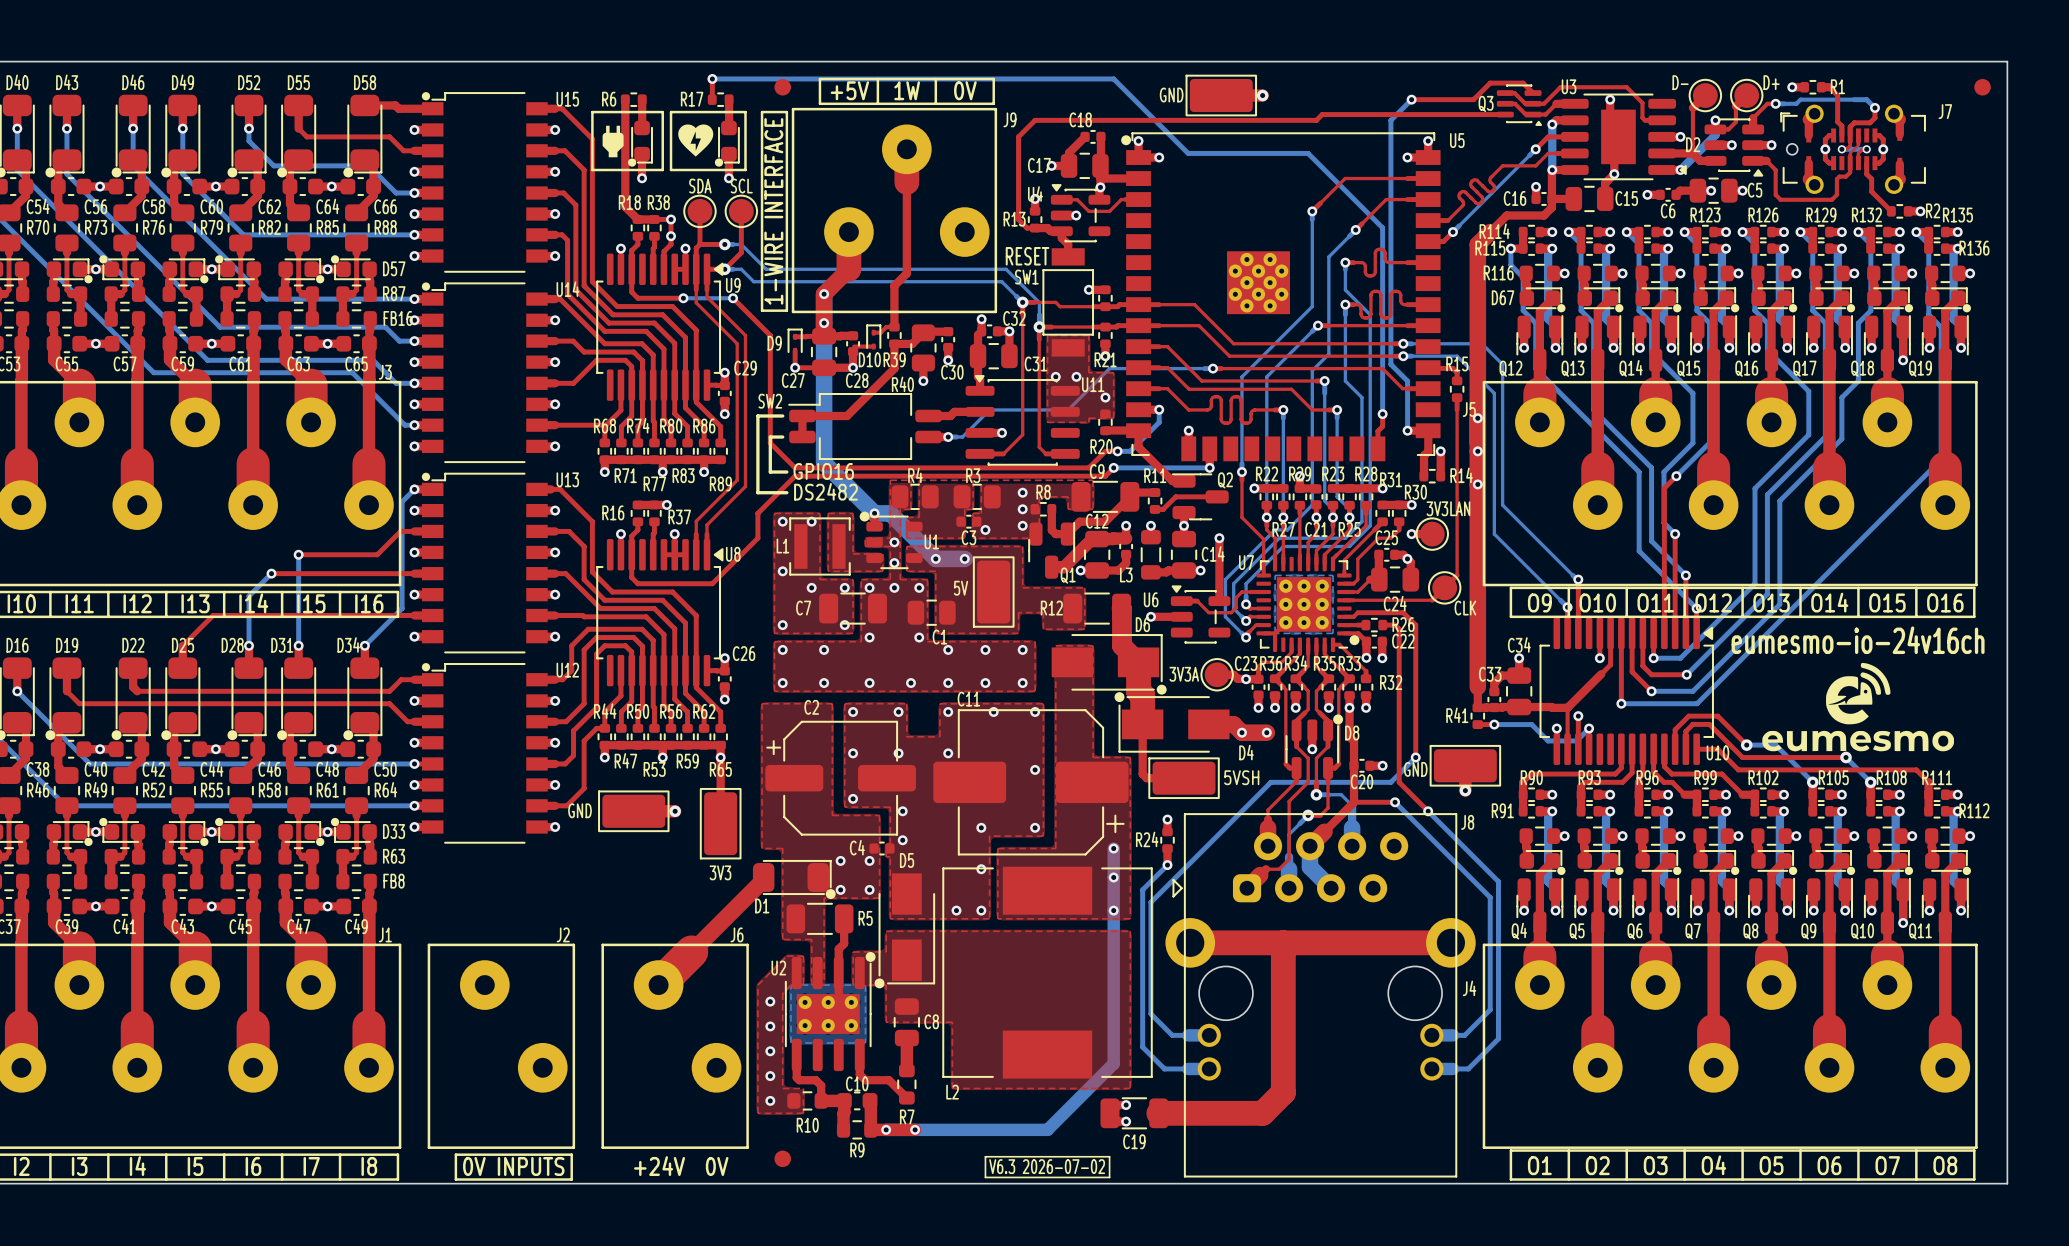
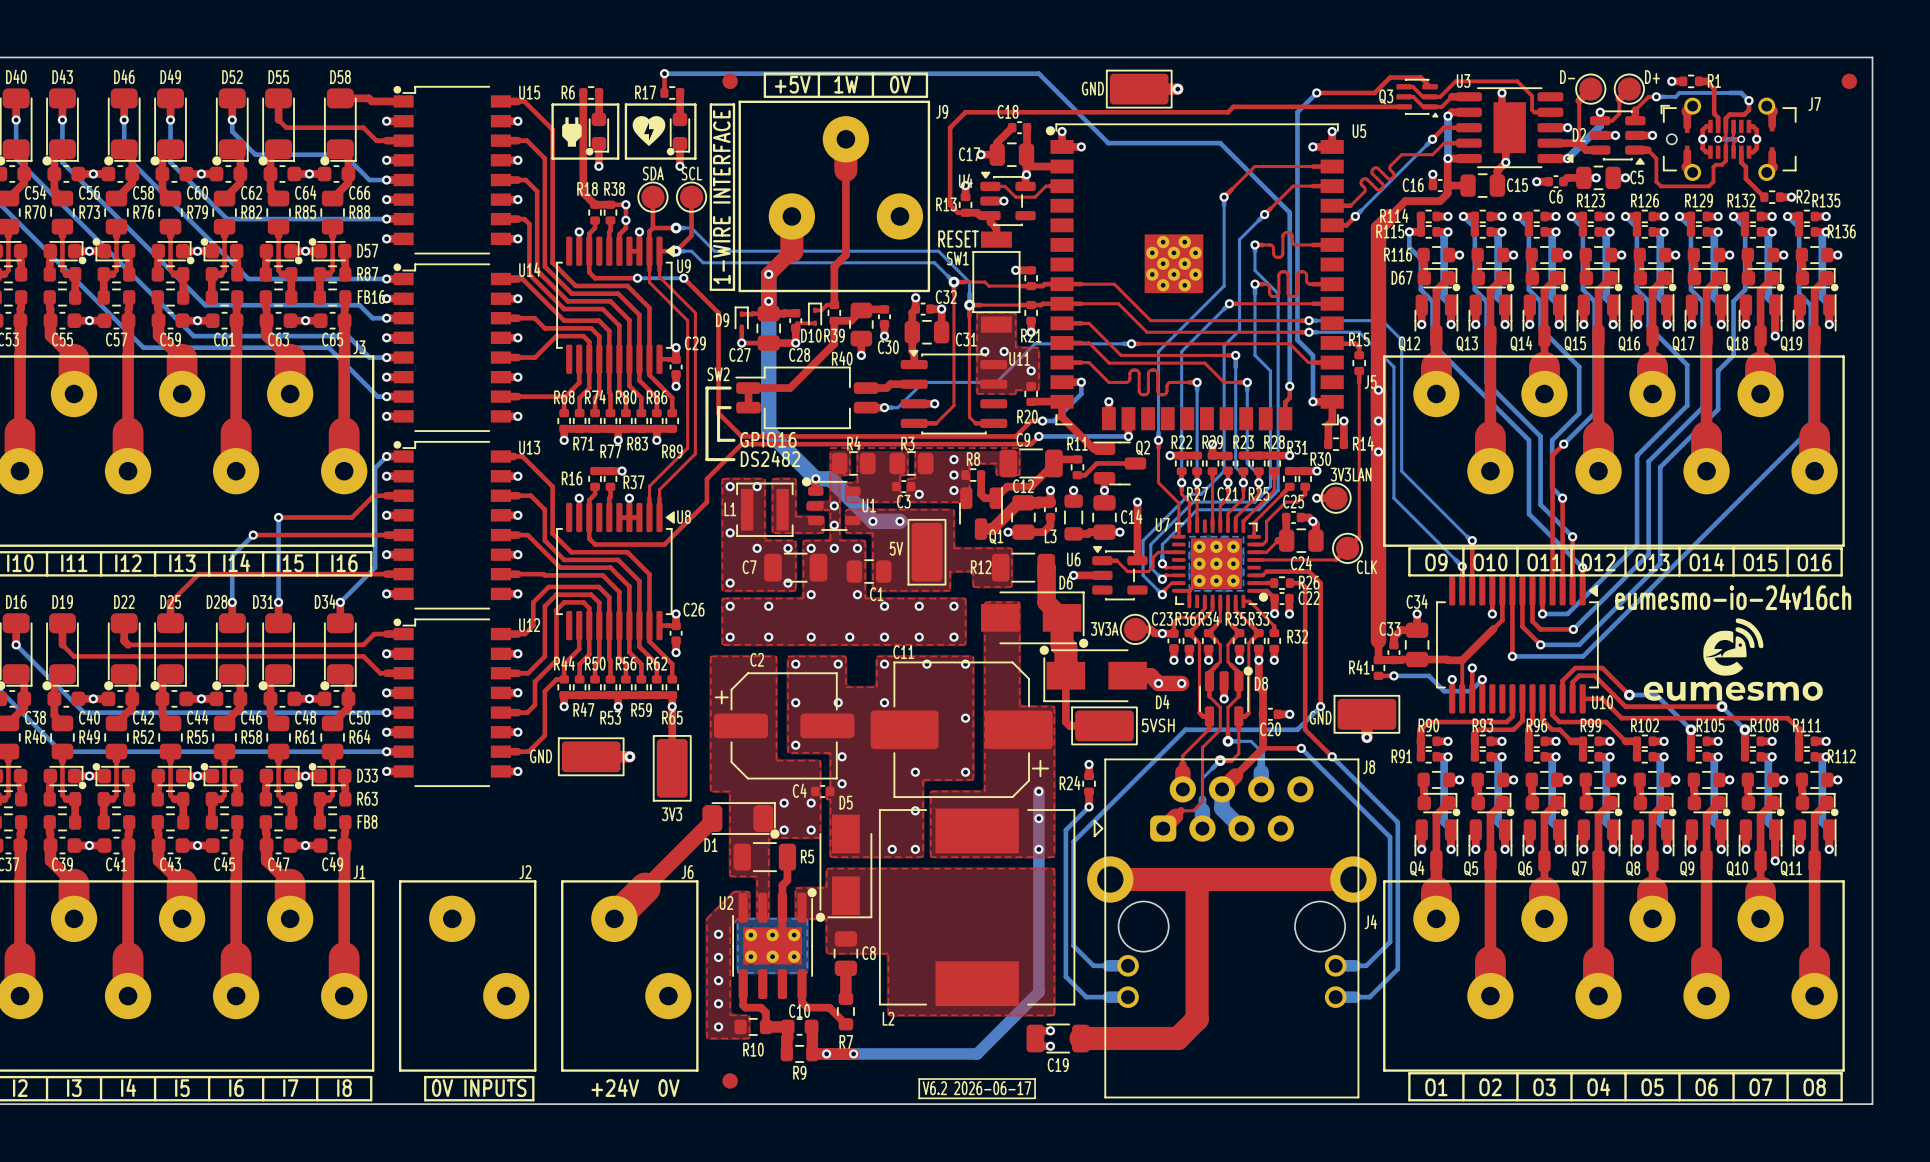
text: V6.3 2026-07-02 (1047, 1166) -> V6.2 2026-06-17 (976, 1088)

